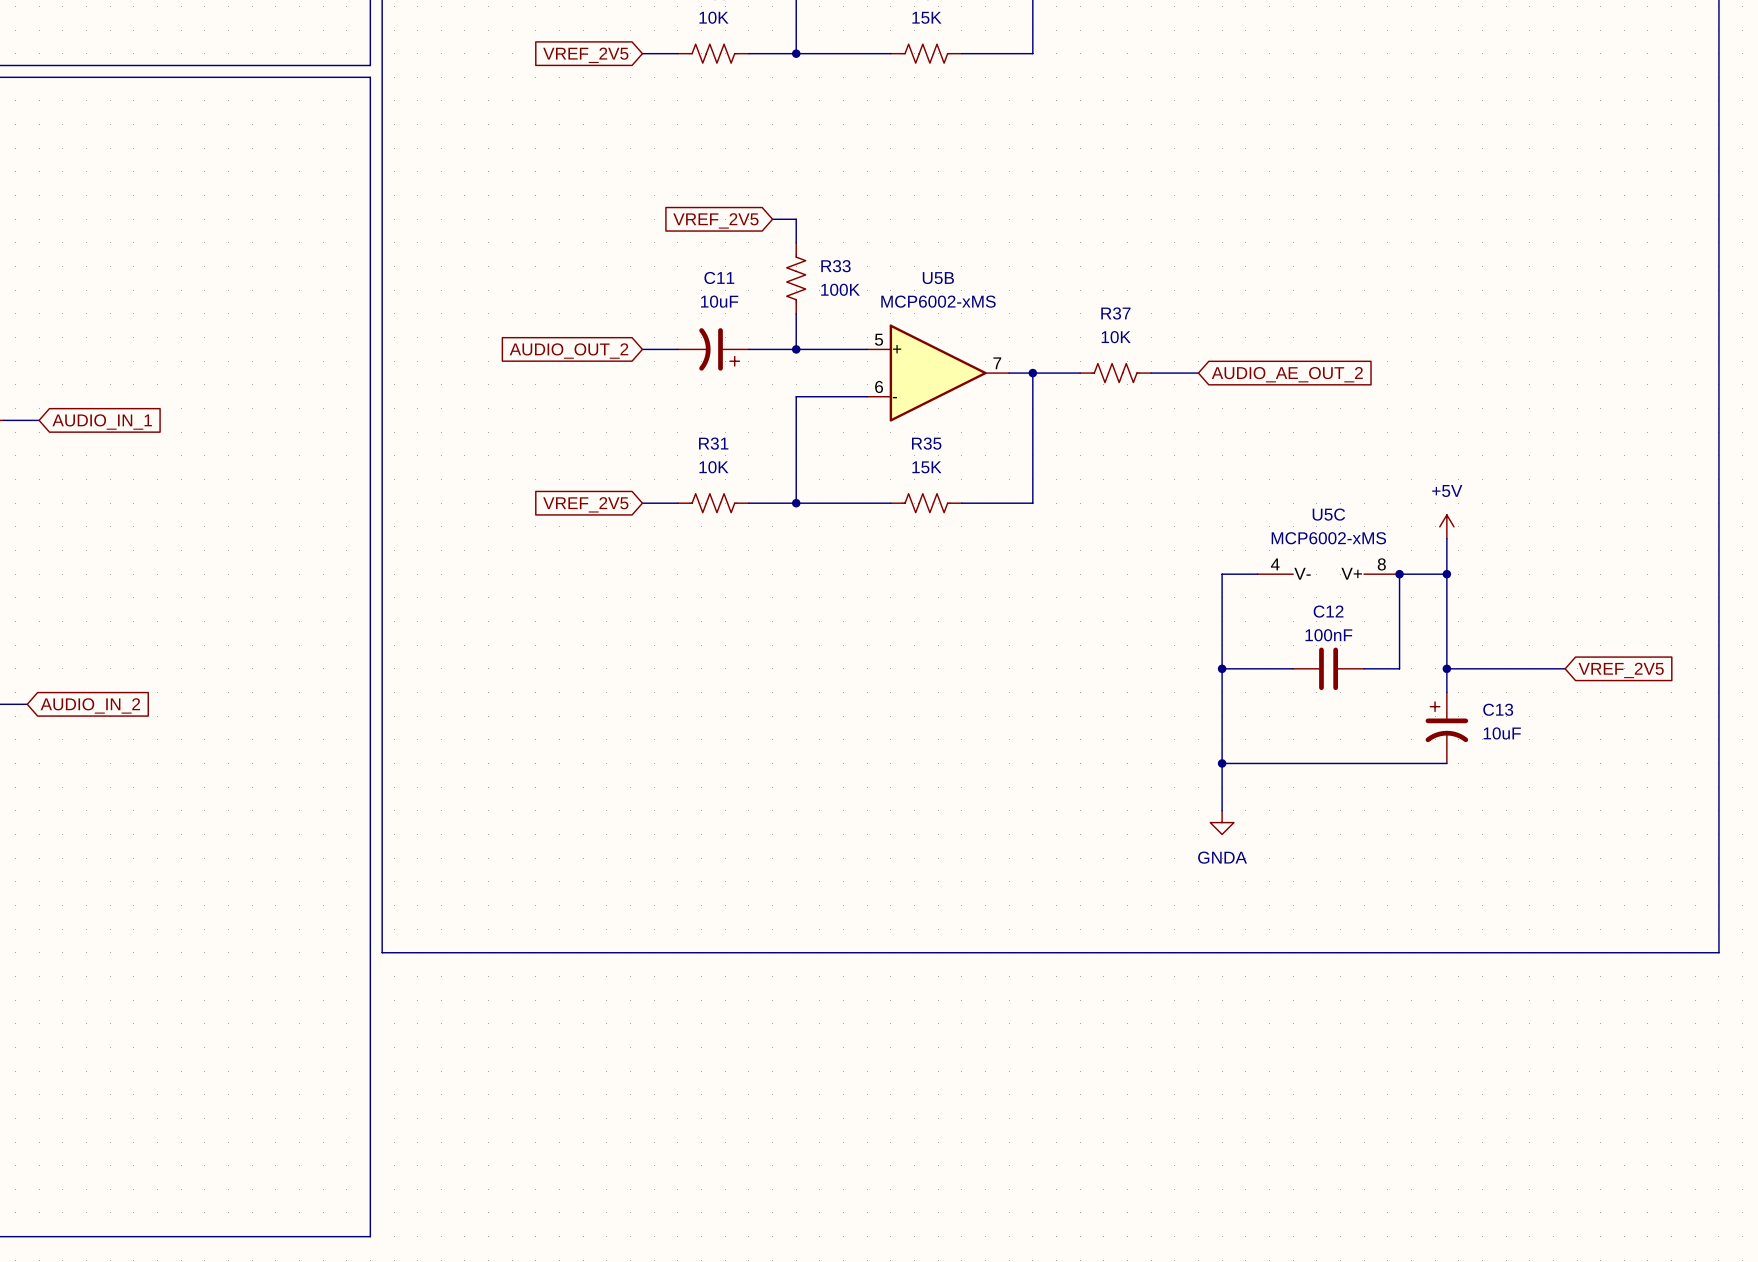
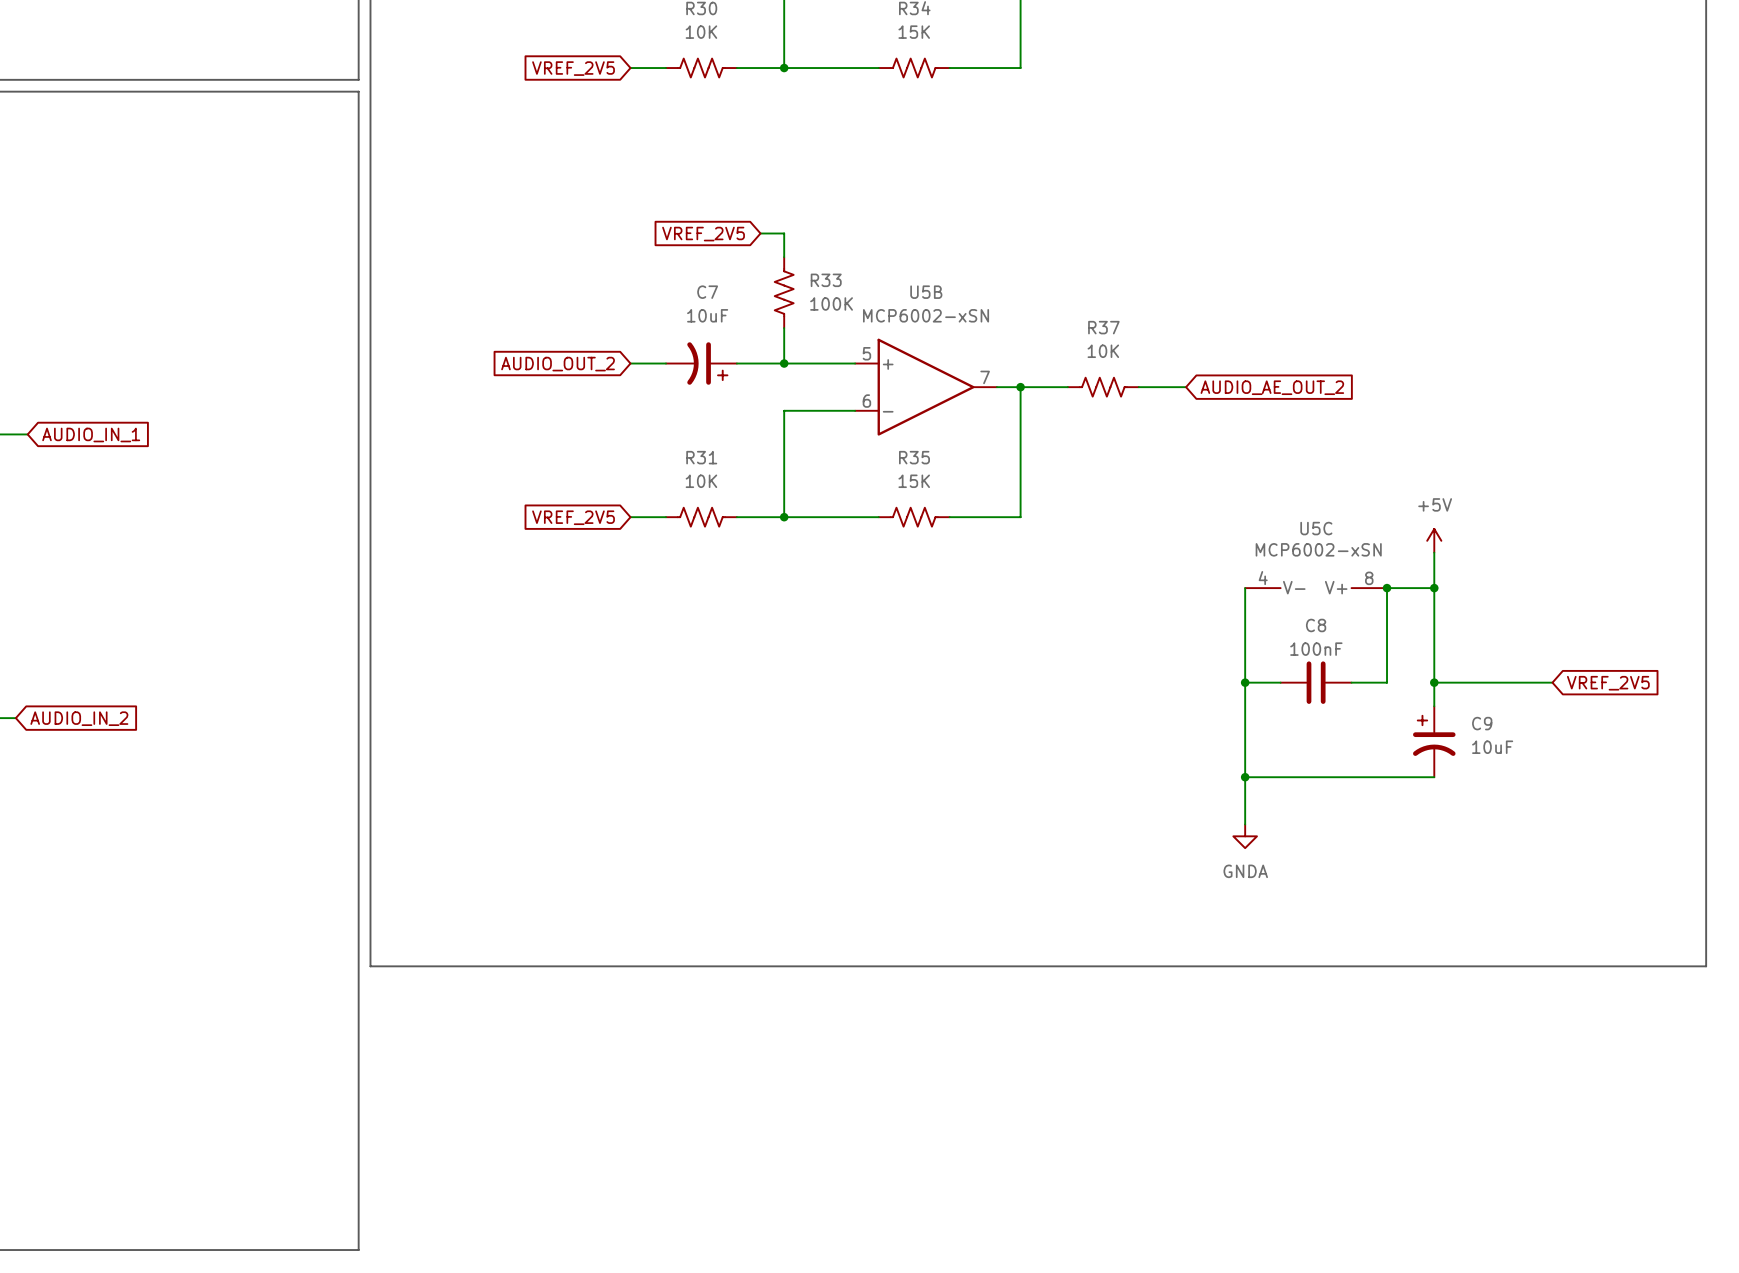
C11 name: C11 (719, 277) -> C7 (707, 292)
U5B value: MCP6002-xMS (938, 301) -> MCP6002-xSN (926, 315)
U5C value: MCP6002-xMS (1328, 538) -> MCP6002-xSN (1318, 549)
wire: (1257, 574) (1222, 574) (1222, 810) -> (1245, 588) (1245, 824)
C12 name: C12 (1328, 611) -> C8 (1316, 625)
wire: (1222, 668) (1257, 668) -> none
junction position: (1222, 668) -> (1245, 682)
C13 name: C13 (1498, 709) -> C9 (1482, 723)
wire: (1222, 763) (1257, 763) -> none
junction position: (1222, 763) -> (1245, 777)
power symbol position: GNDA (1222, 822) -> GNDA (1245, 836)

